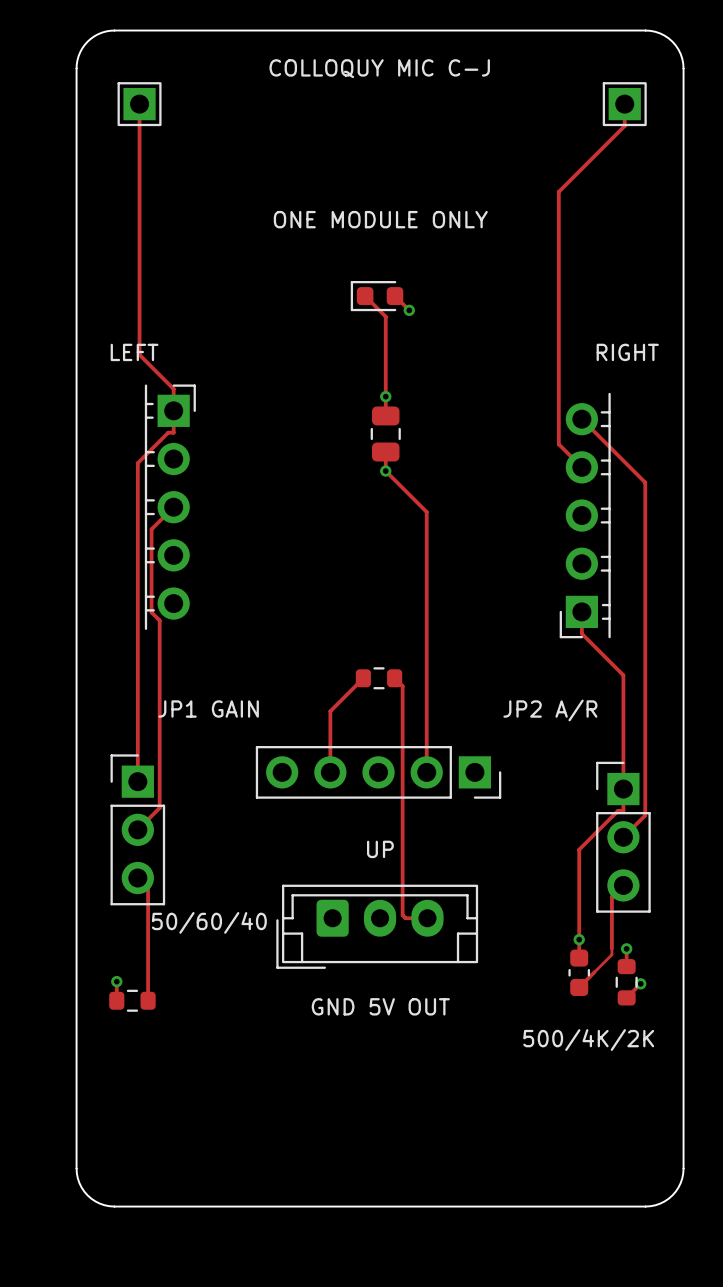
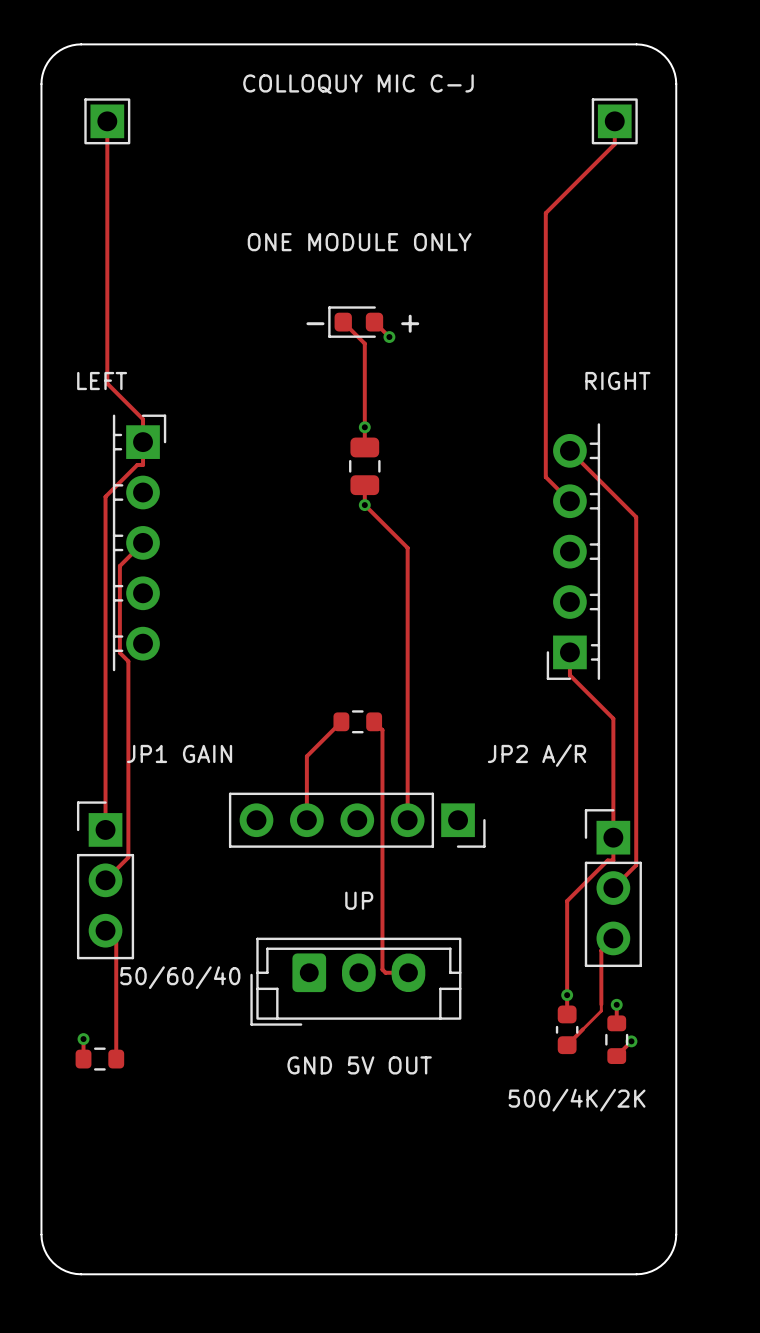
part text: none -> - (315, 323)
part text: none -> + (410, 323)

